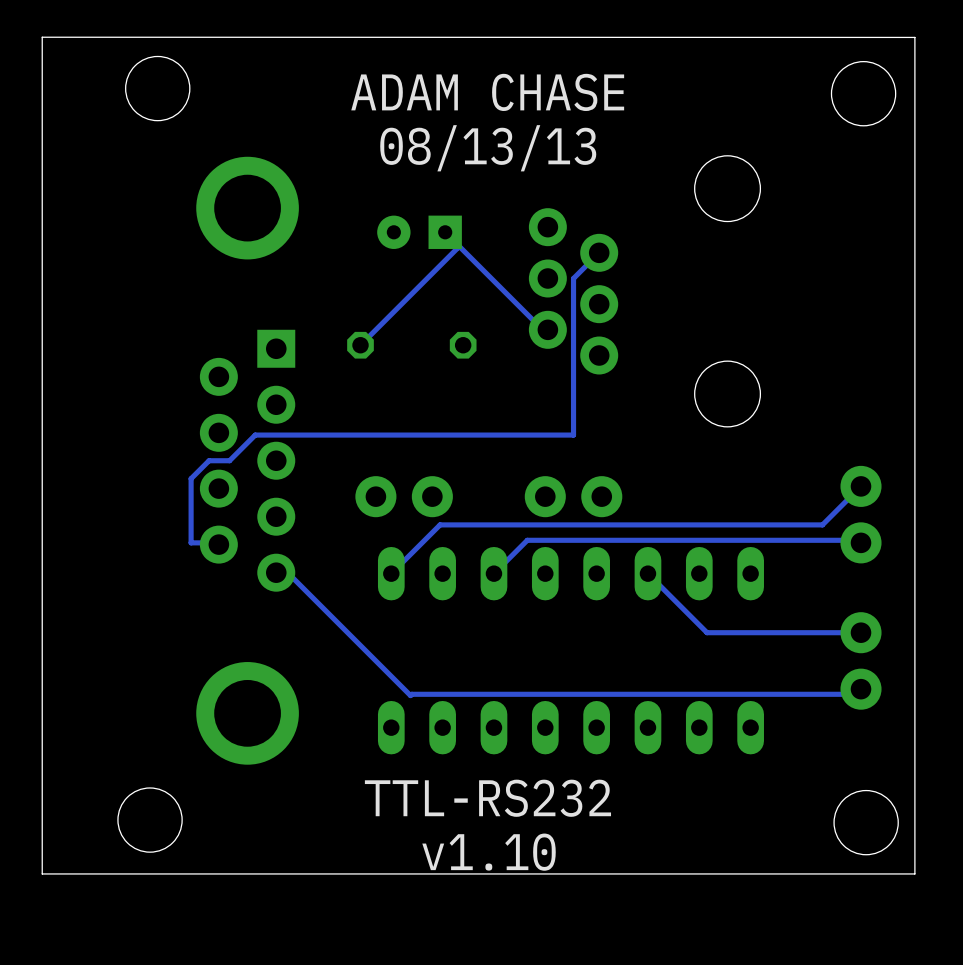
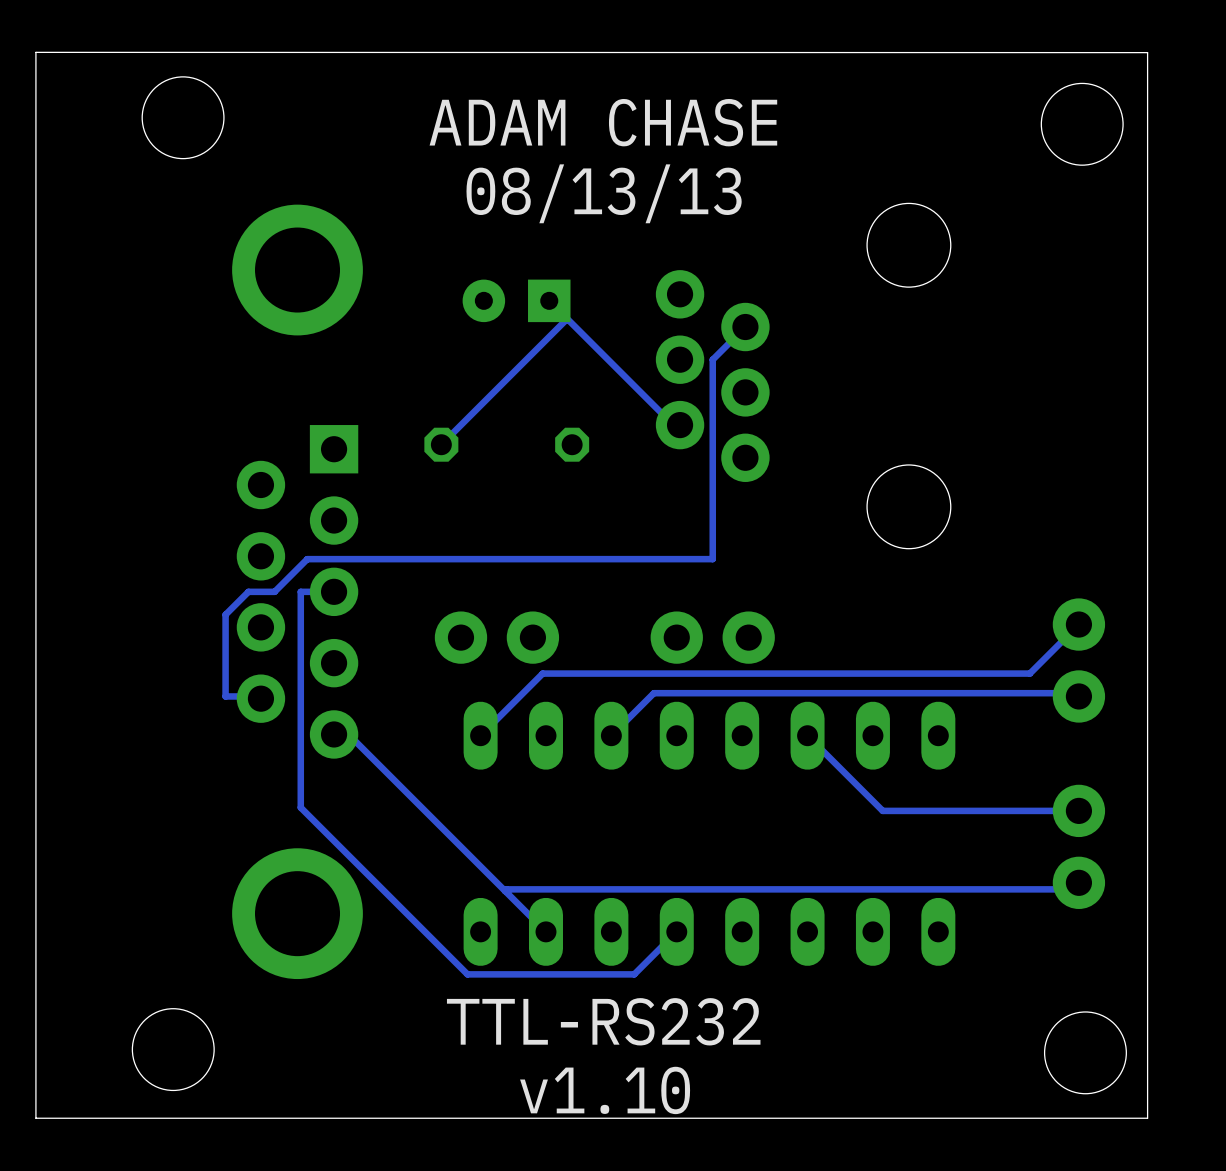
track: none -> (334, 591) (300, 591) (300, 807) (467, 974) (634, 974) (676, 931)
track: none -> (505, 891) (545, 931)

